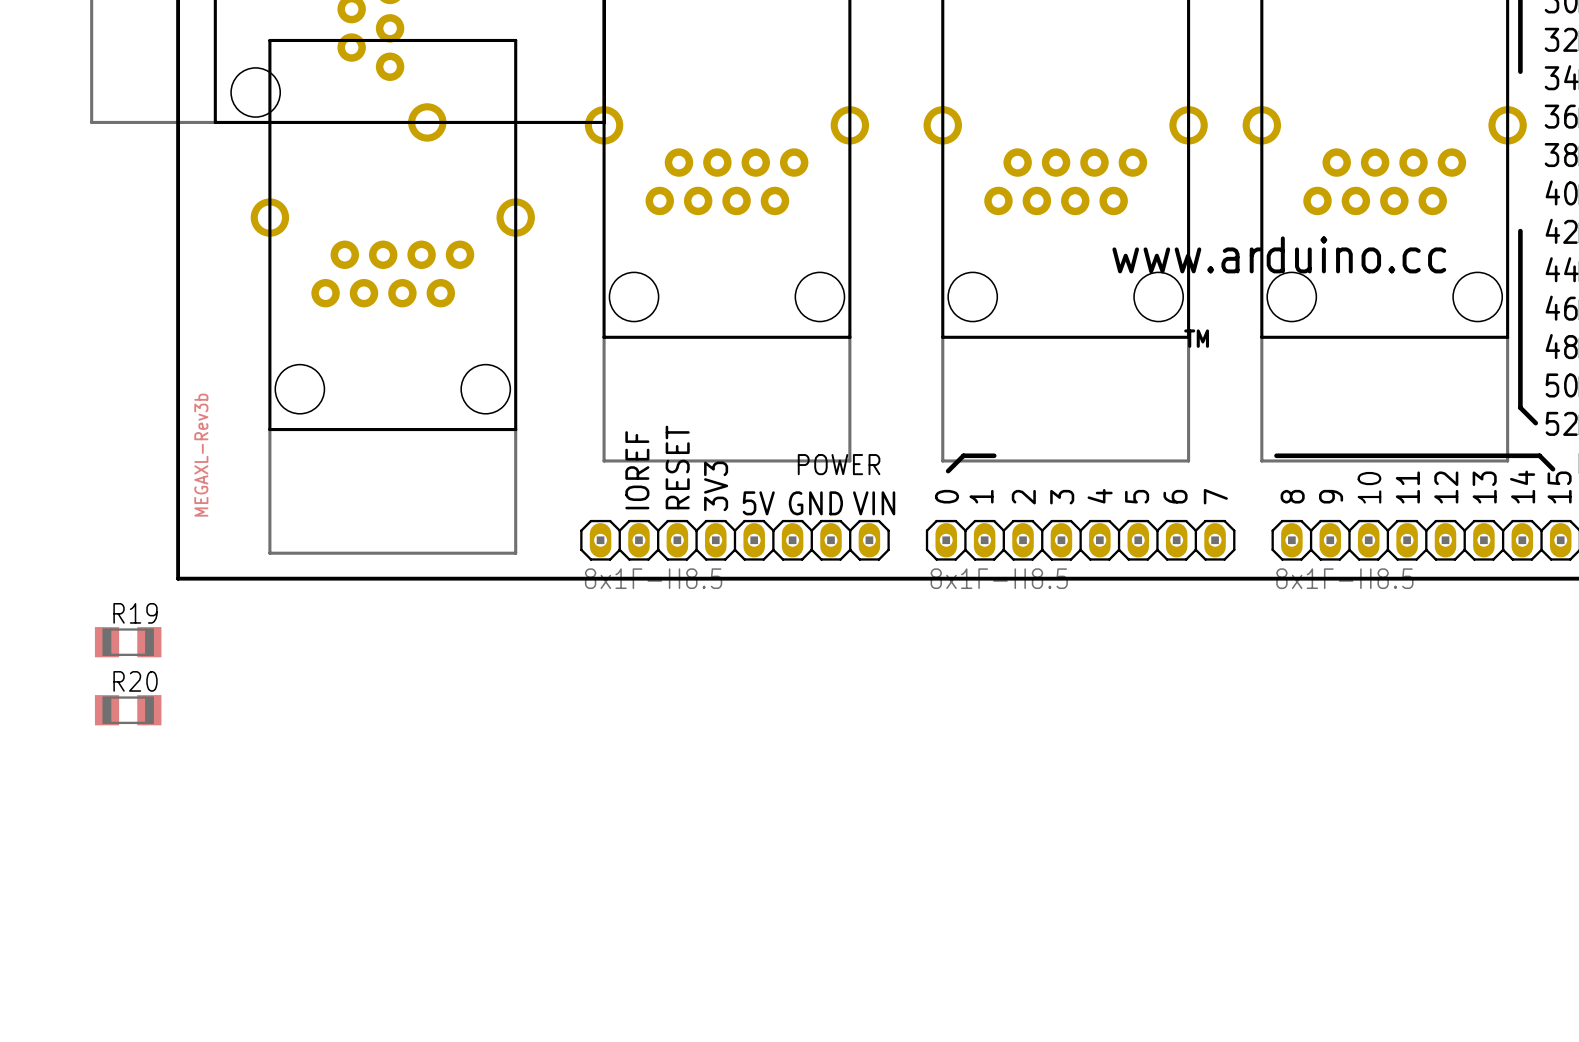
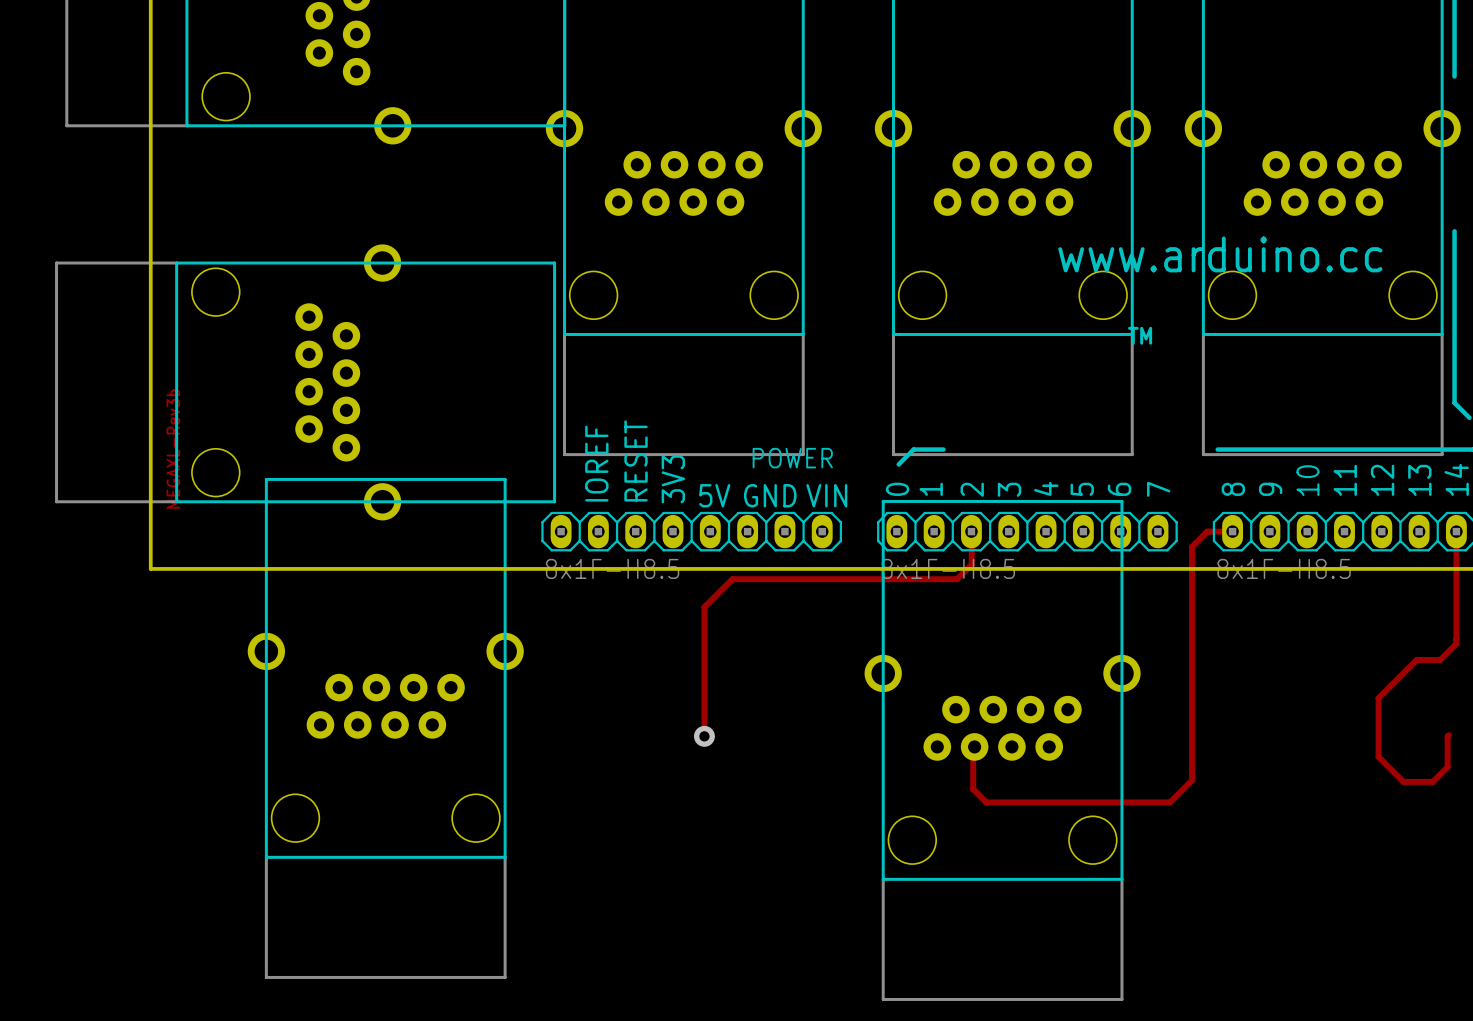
part rotation: 0° (392, 296) -> 90° clockwise (305, 382)
track: none -> (971, 531) (971, 564) (957, 579) (732, 579) (704, 607) (704, 736)
track: none -> (1232, 531) (1207, 531) (1192, 546) (1192, 780) (1170, 802) (986, 802) (973, 789) (974, 746)
track: none -> (1456, 531) (1456, 643) (1440, 659) (1416, 659) (1378, 698) (1378, 756) (1403, 781) (1432, 781) (1447, 767) (1448, 735)
R19: (128, 642) -> none
R20: (128, 710) -> none
part: none -> (385, 728)
via: none -> (704, 736)
part: none -> (1002, 750)

